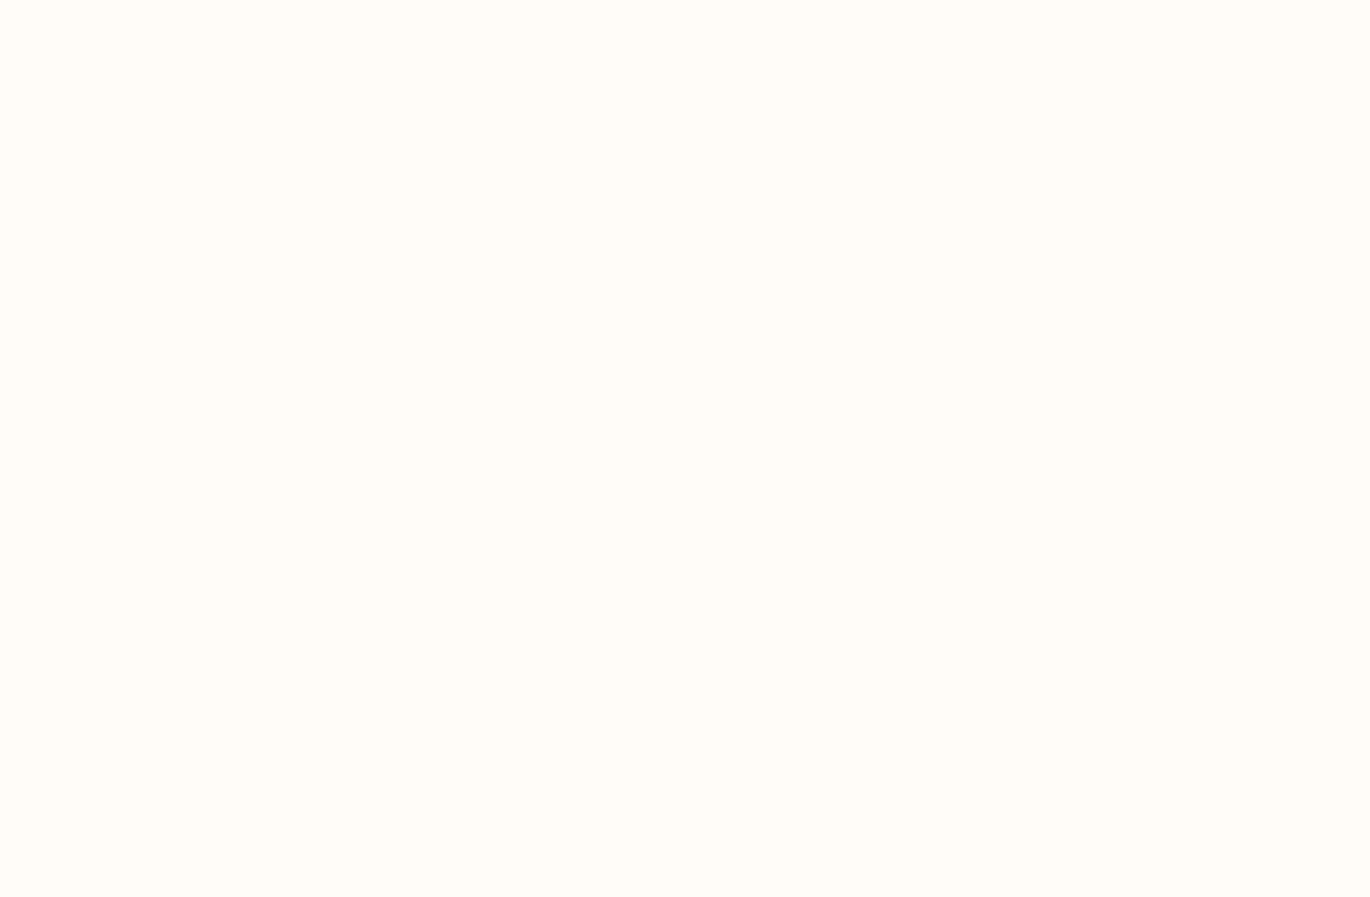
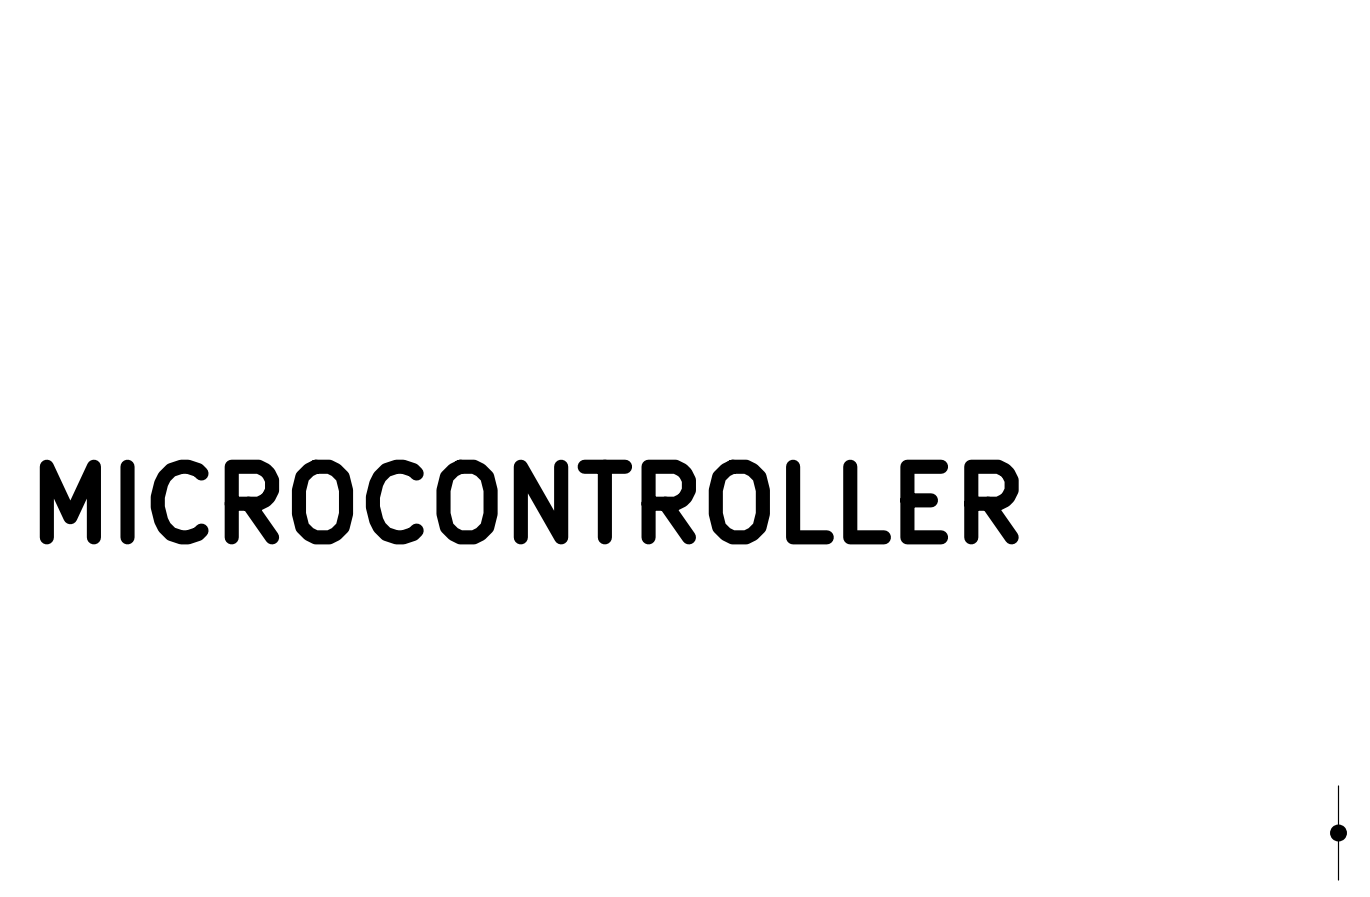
text: none -> MICROCONTROLLER (529, 502)
wire: none -> (1338, 785) (1338, 880)
junction: none -> (1338, 832)

